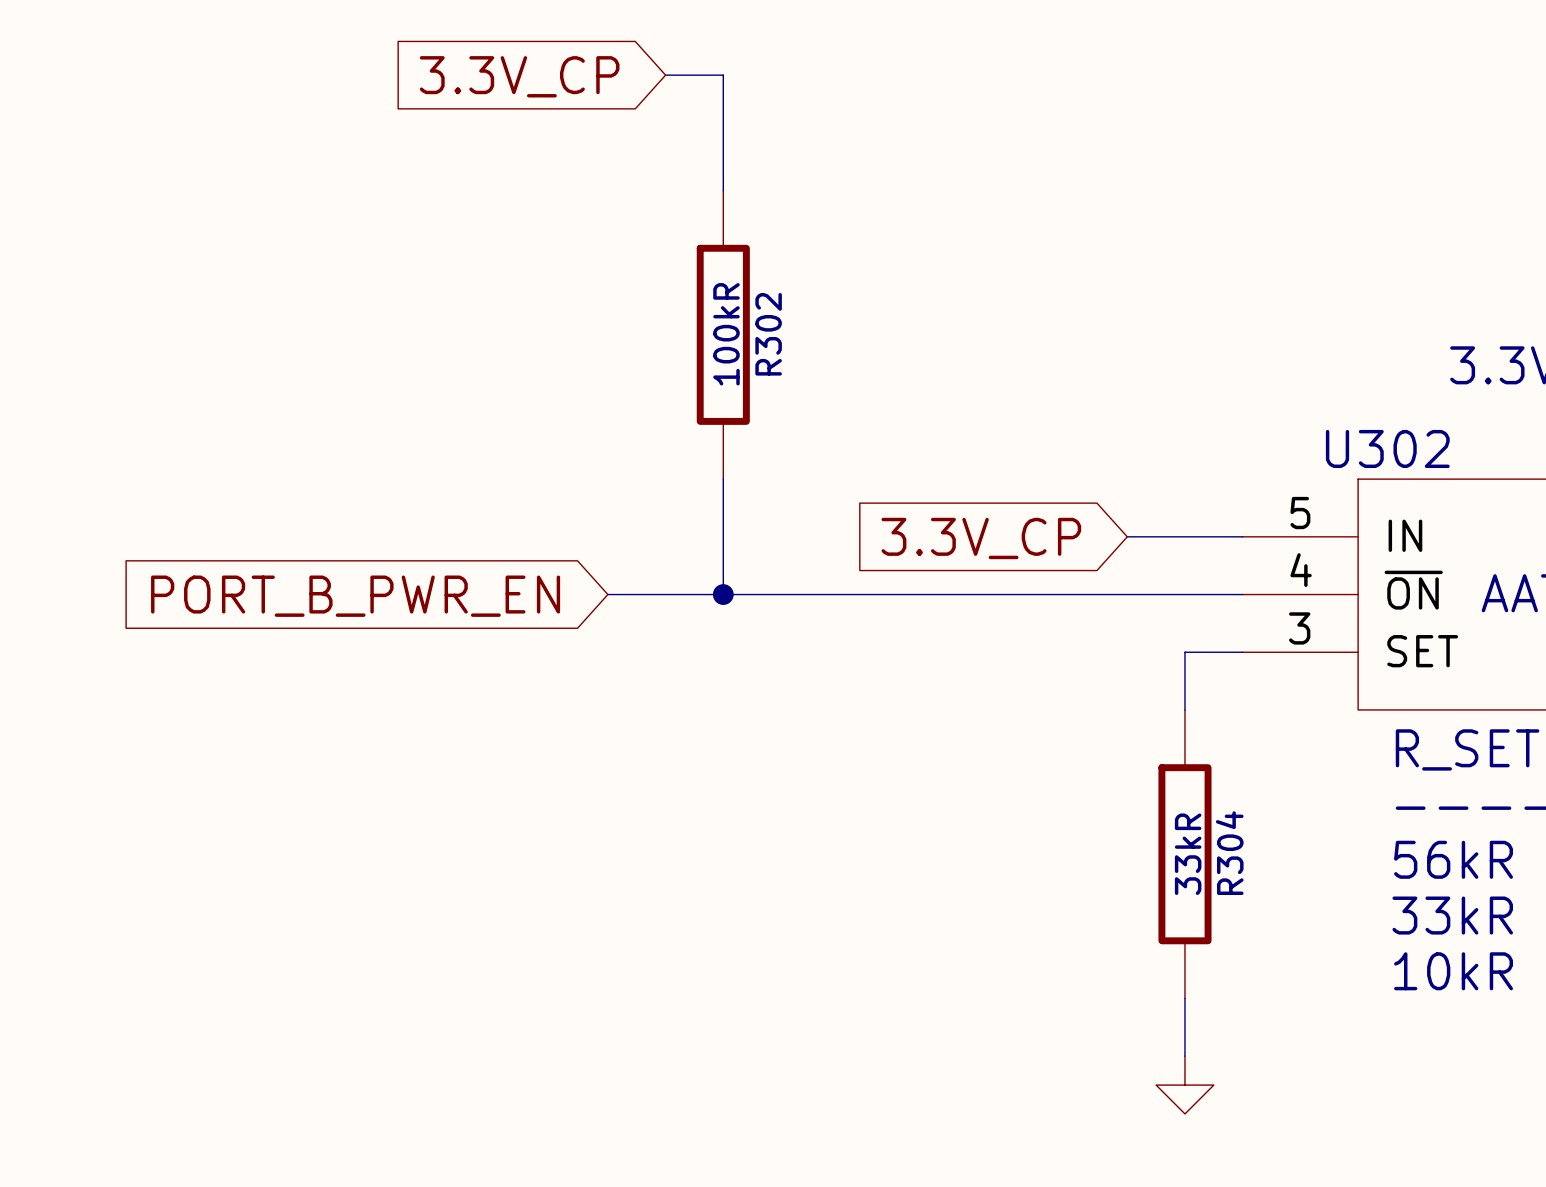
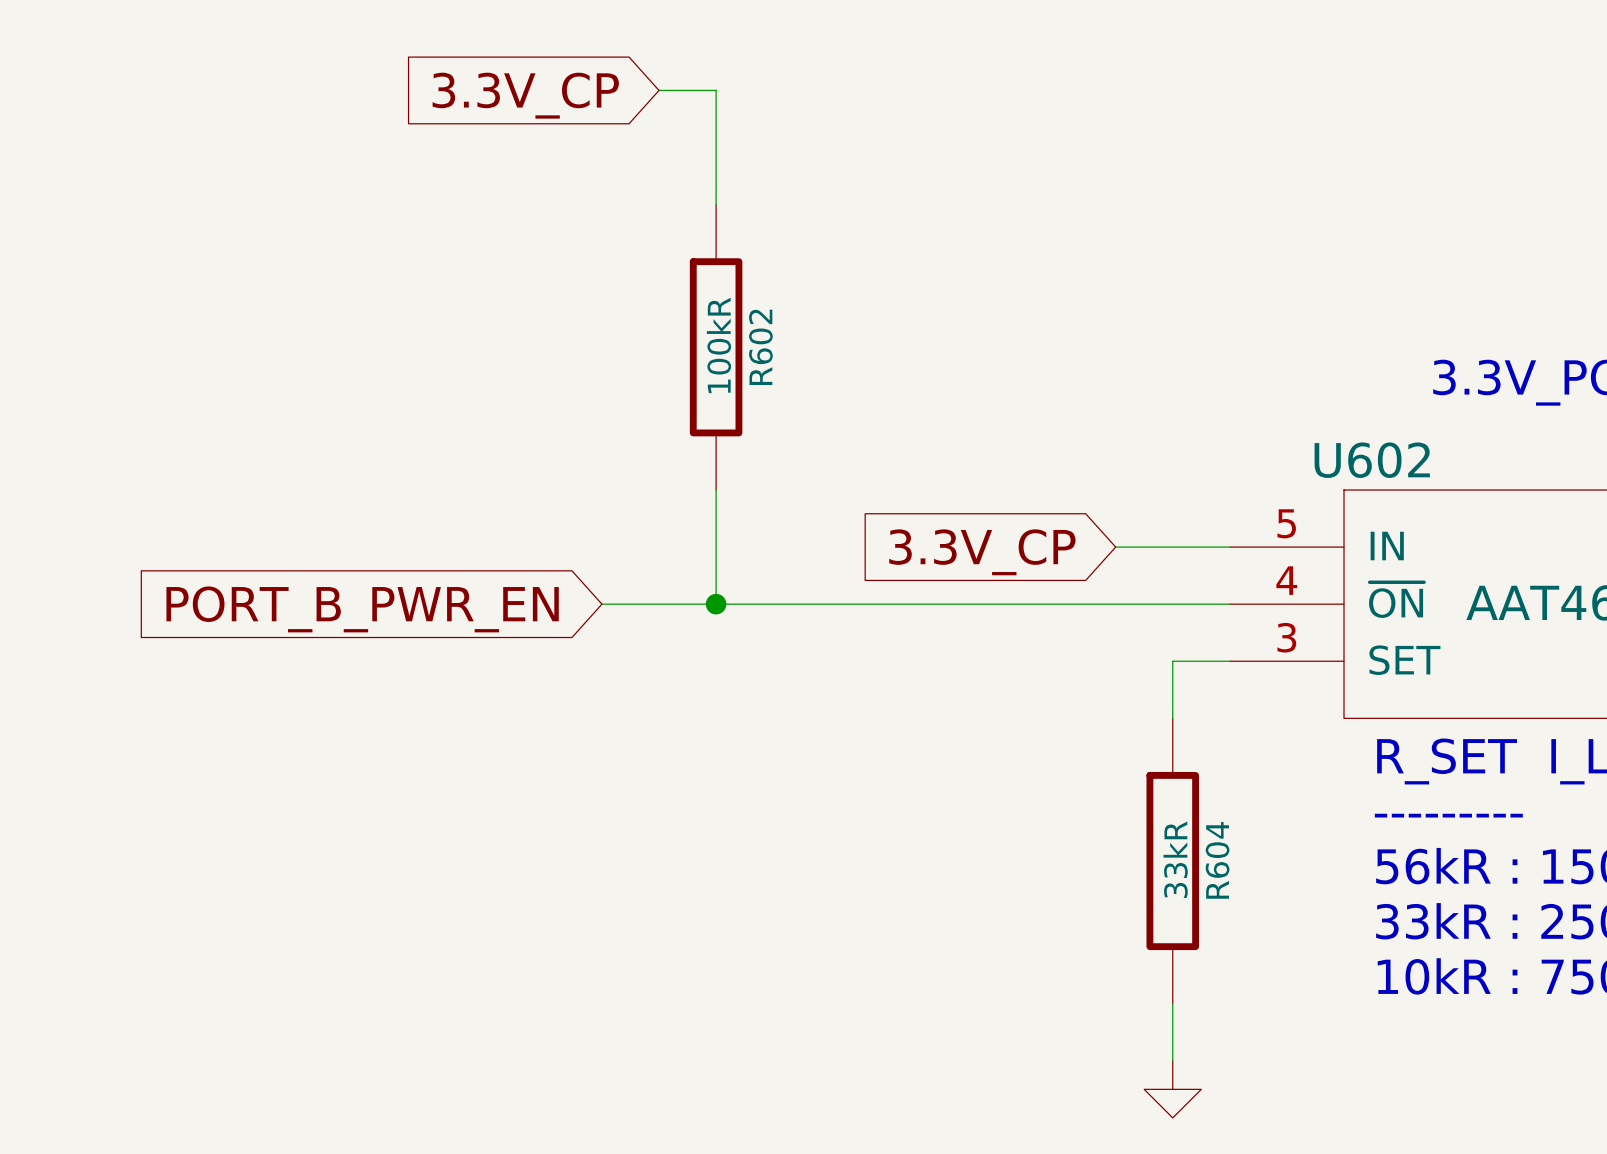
R302 name: R302 (768, 334) -> R602 (760, 347)
U302 name: U302 (1387, 448) -> U602 (1372, 460)
R304 name: R304 (1229, 853) -> R604 (1217, 860)

